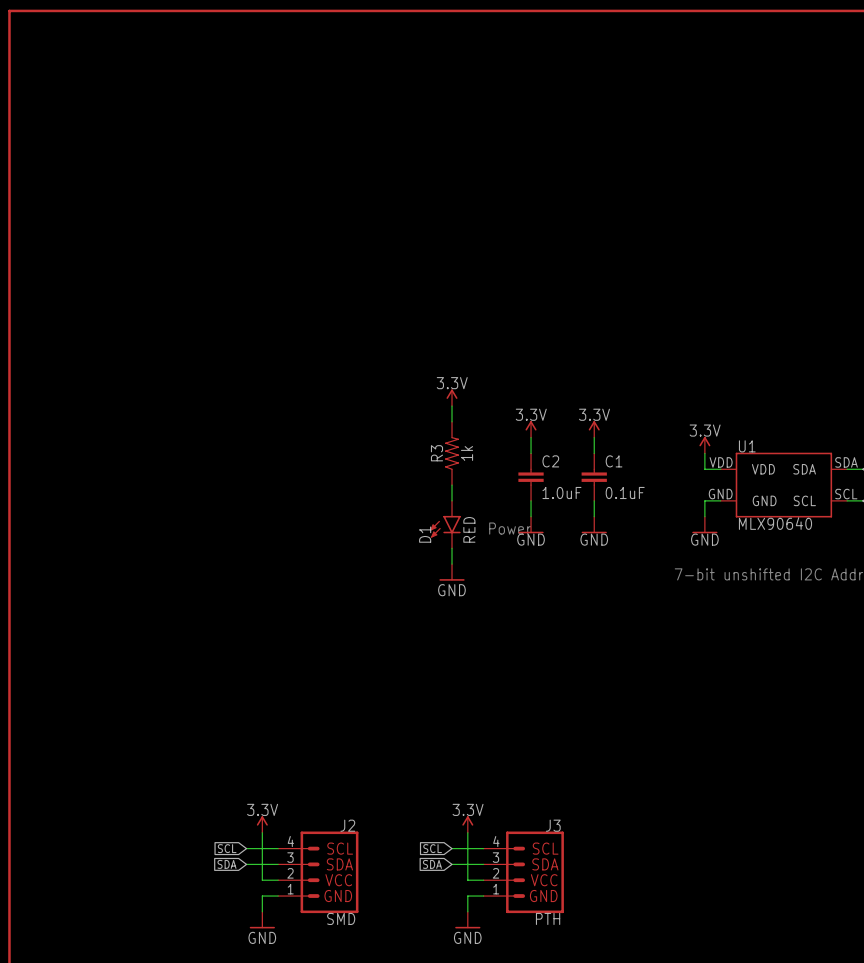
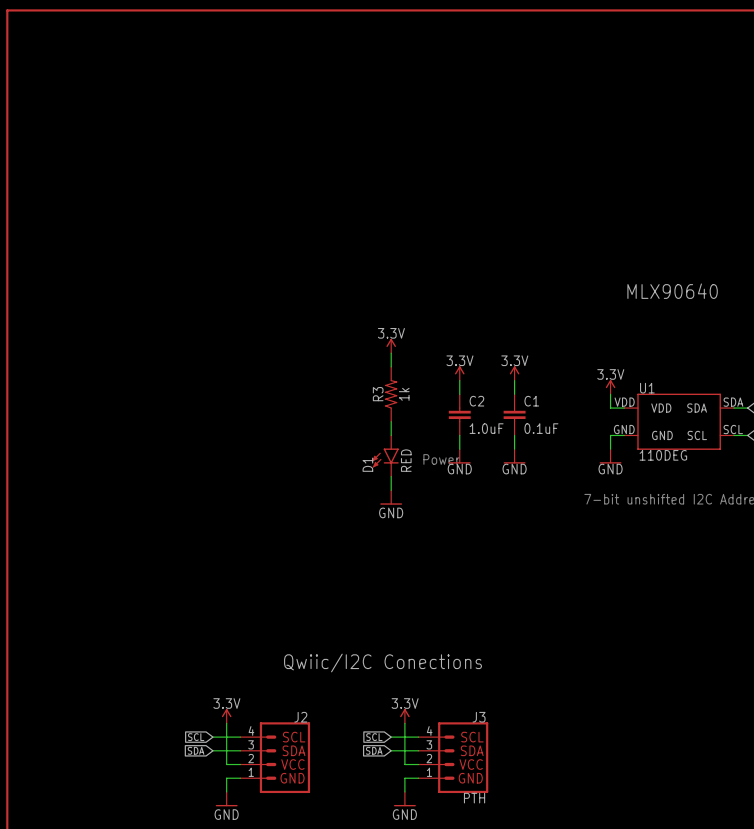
text: none -> MLX90640 (672, 291)
U1 value: MLX90640 (775, 523) -> 110DEG (663, 455)
text: none -> Qwiic/I2C Conections (383, 663)
J2 value: SMD (341, 918) -> none

